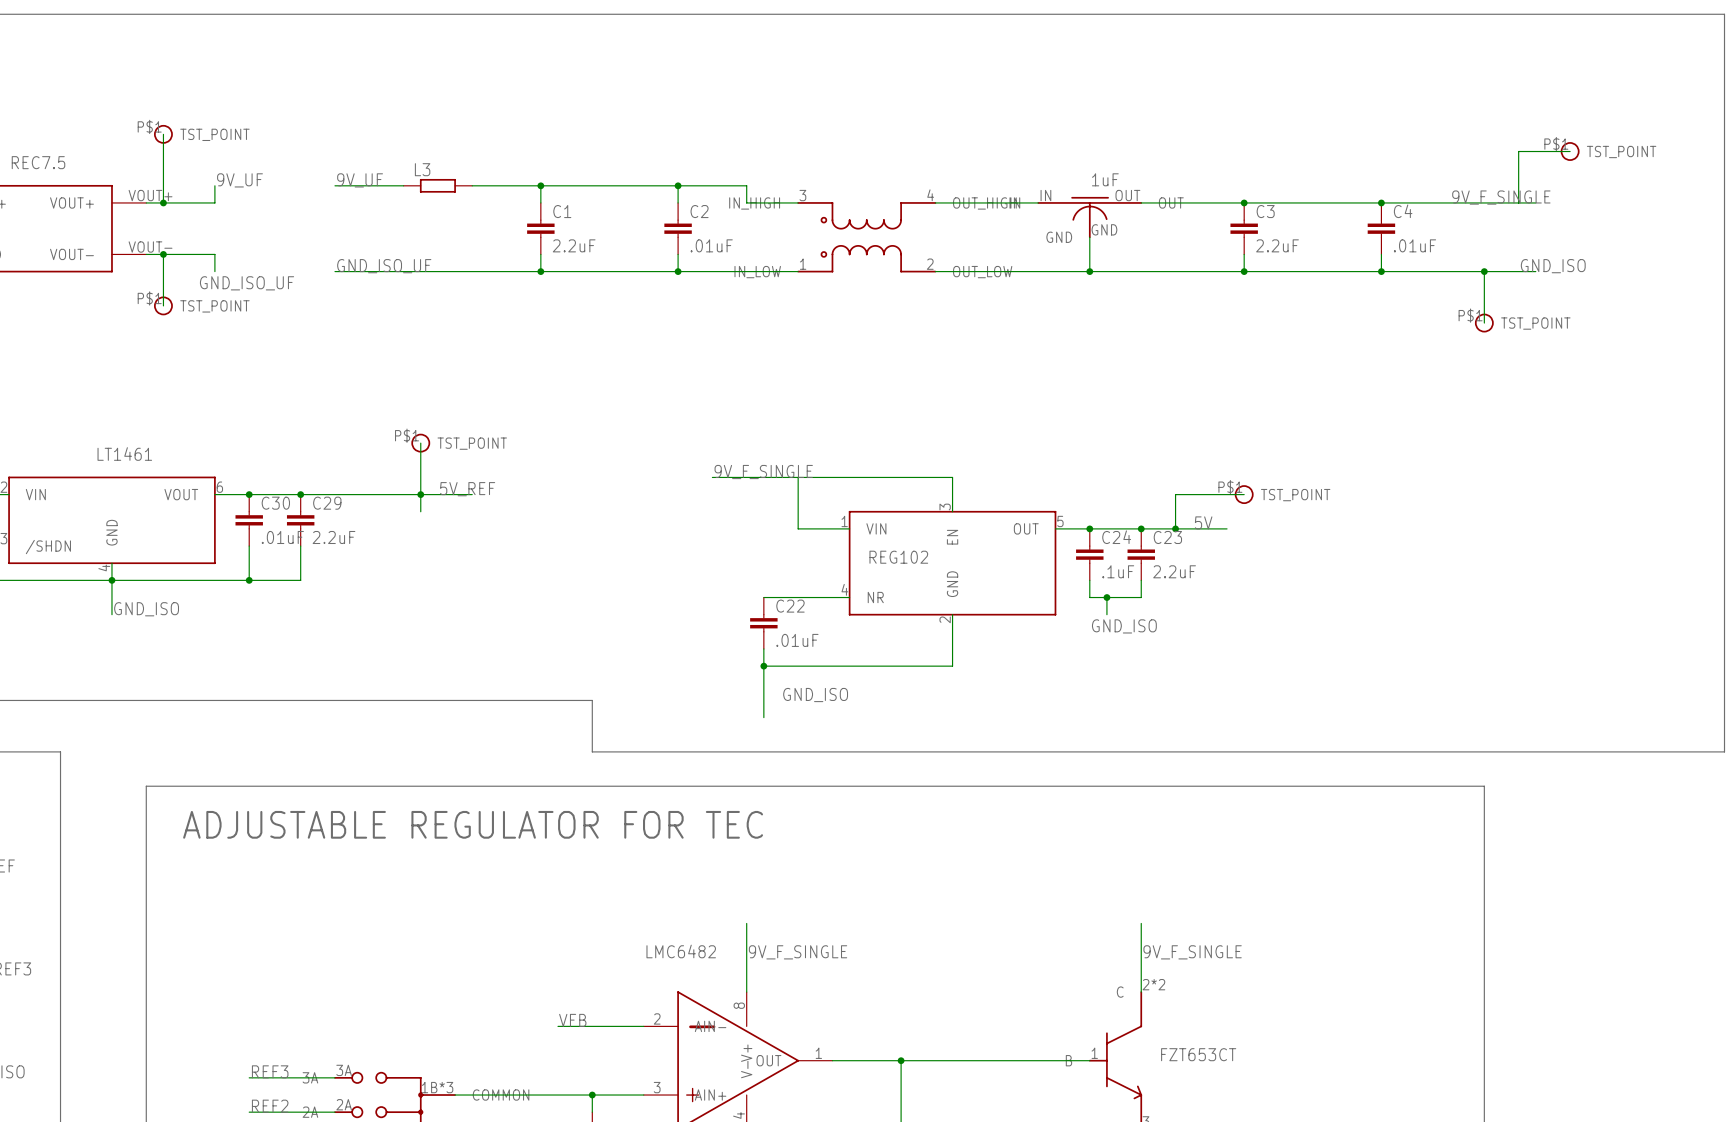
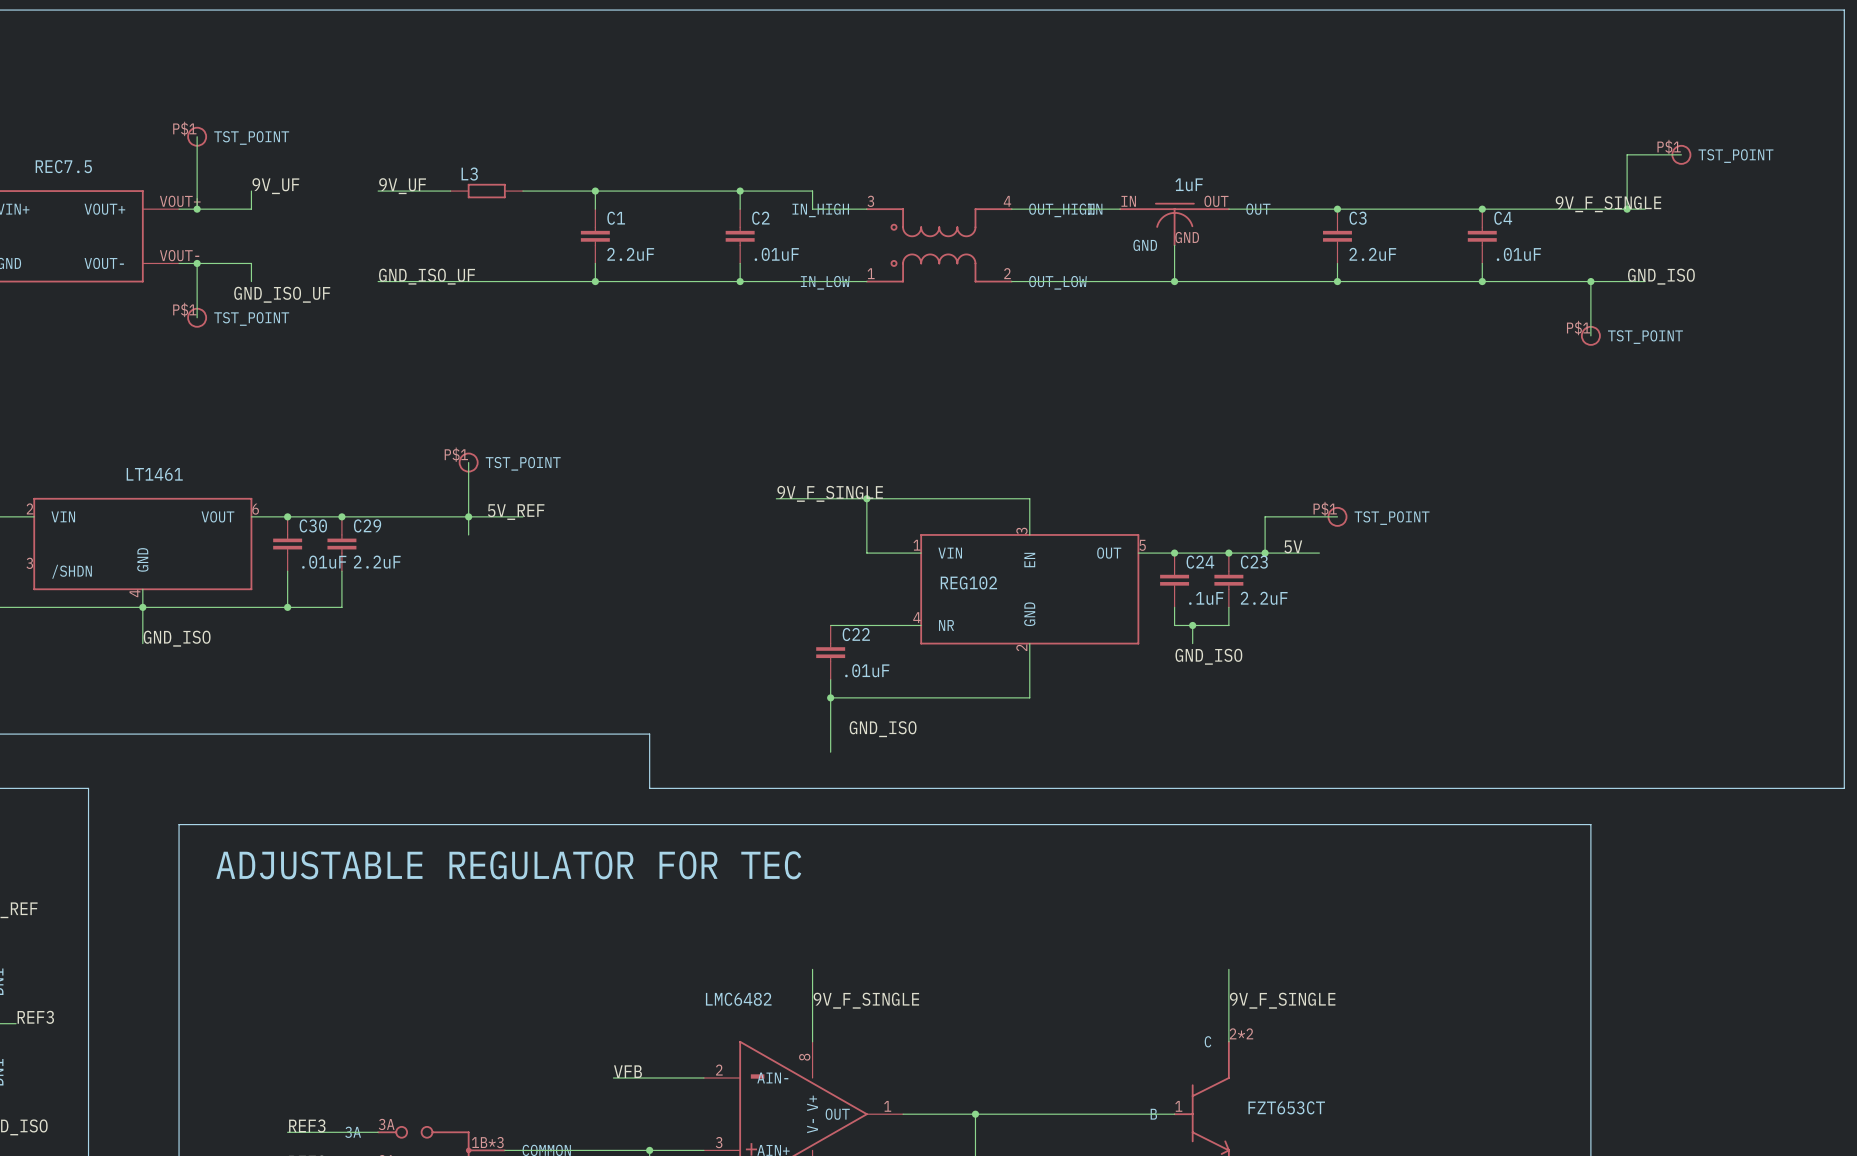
junction: none -> (1627, 209)
junction: none -> (866, 498)

